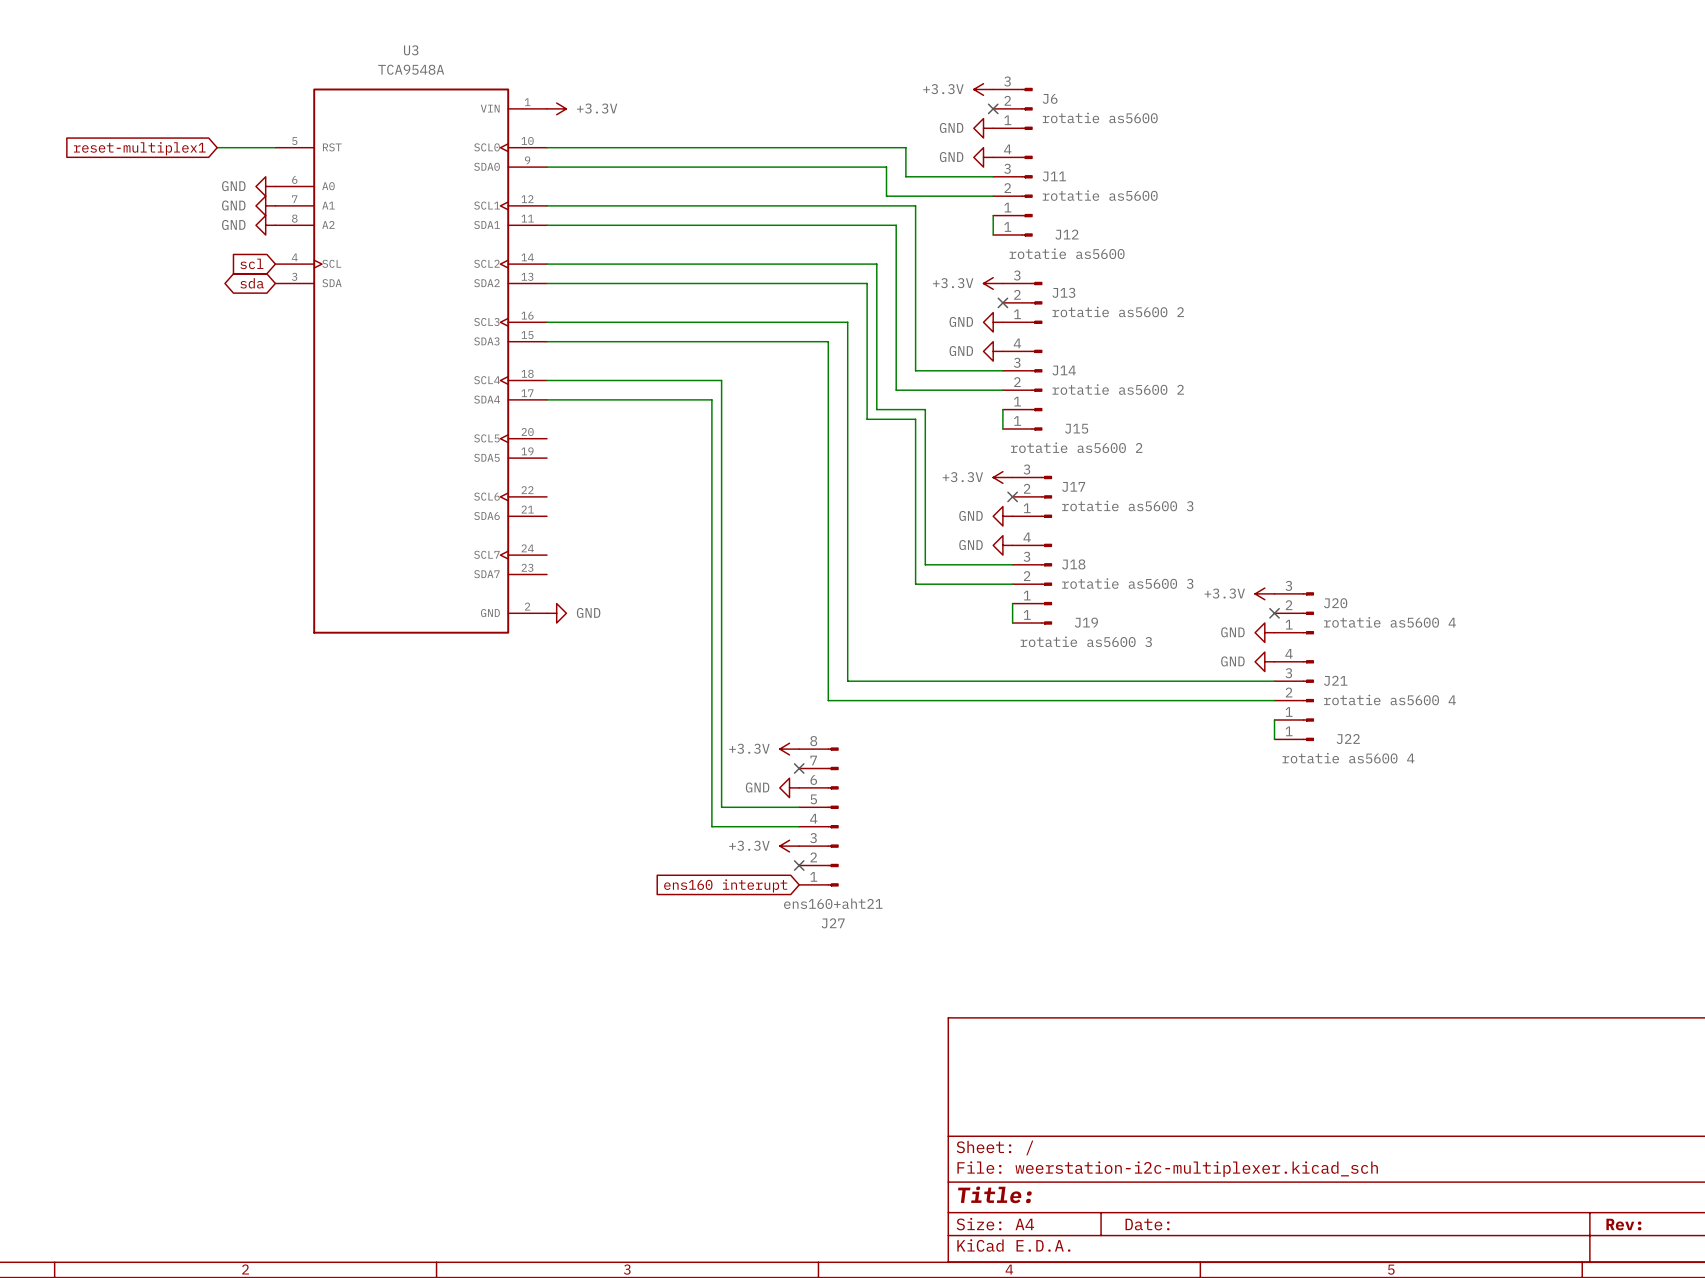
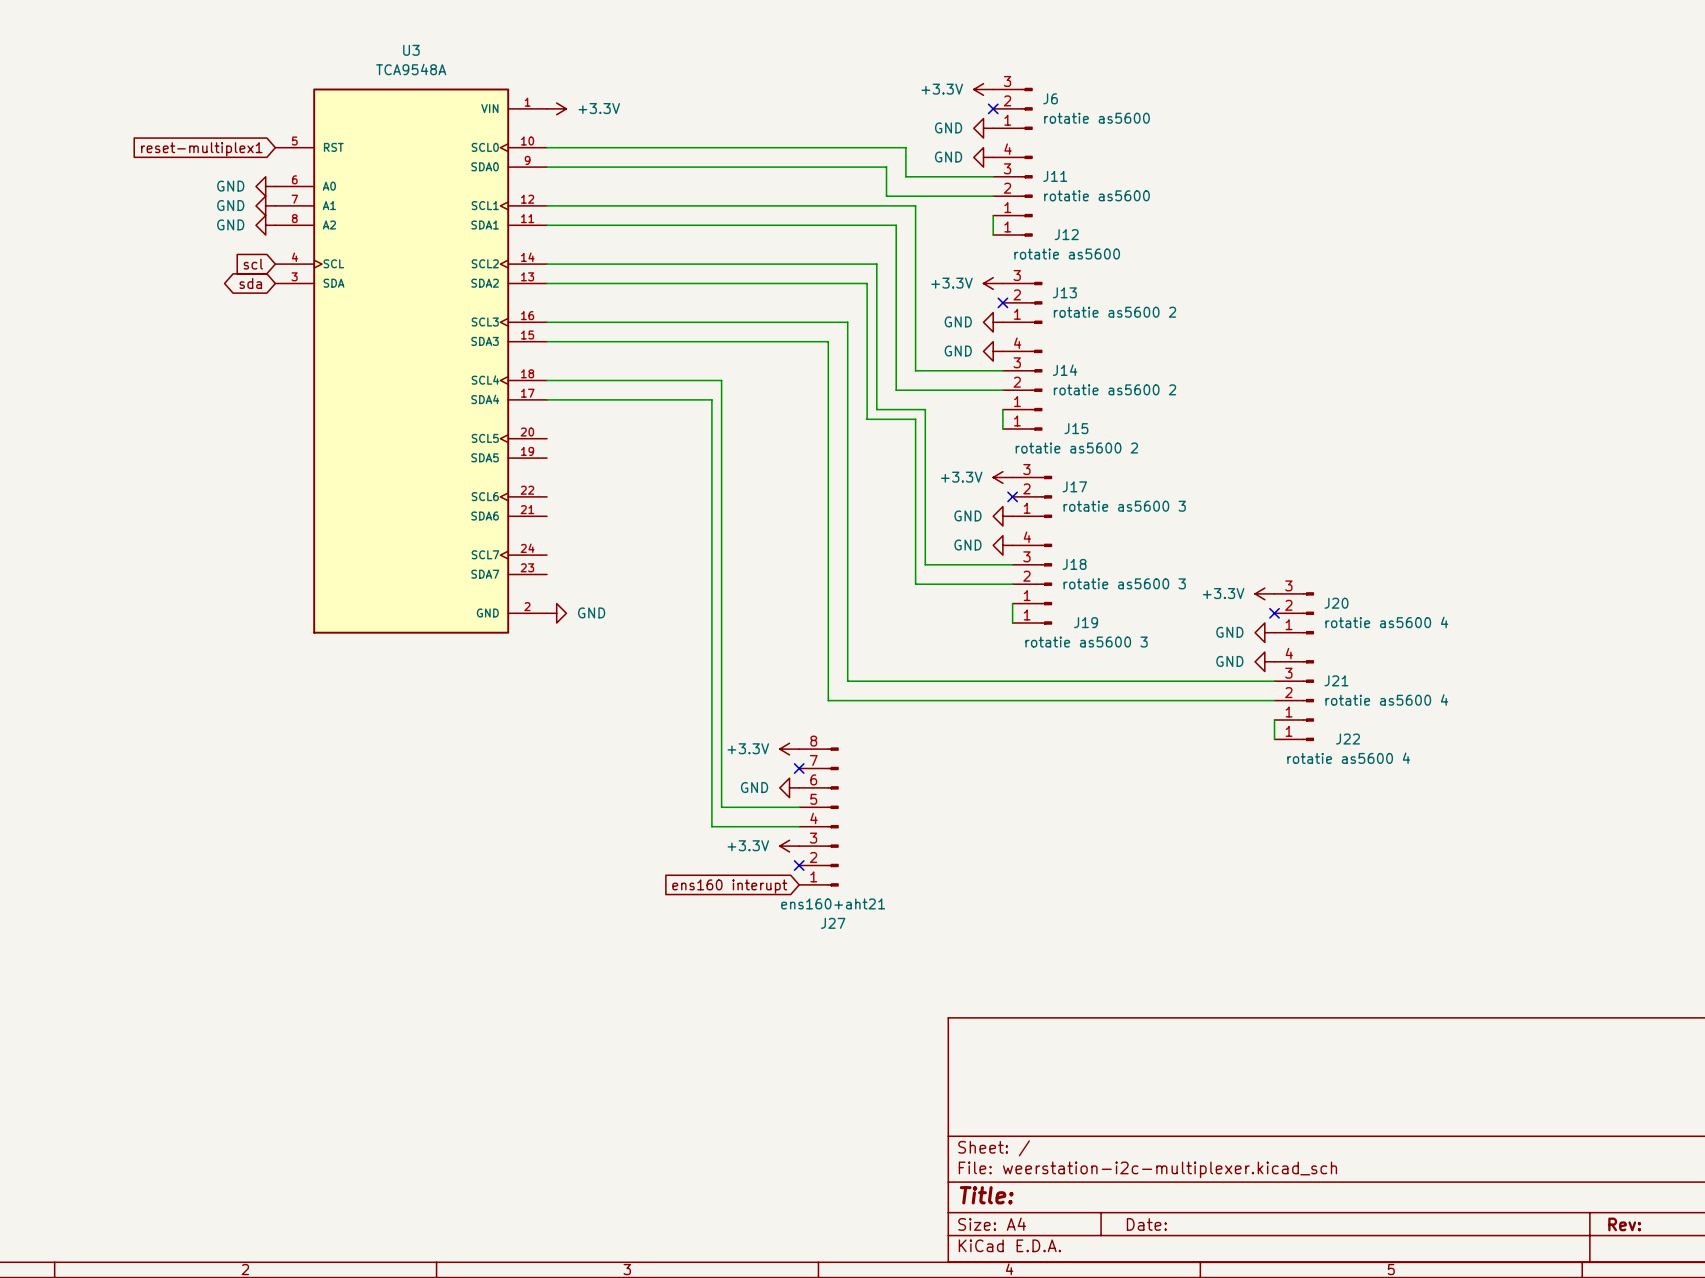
wire: (217, 147) (275, 147) -> none
global label position: reset-multiplex1 (139, 148) -> reset-multiplex1 (201, 149)

